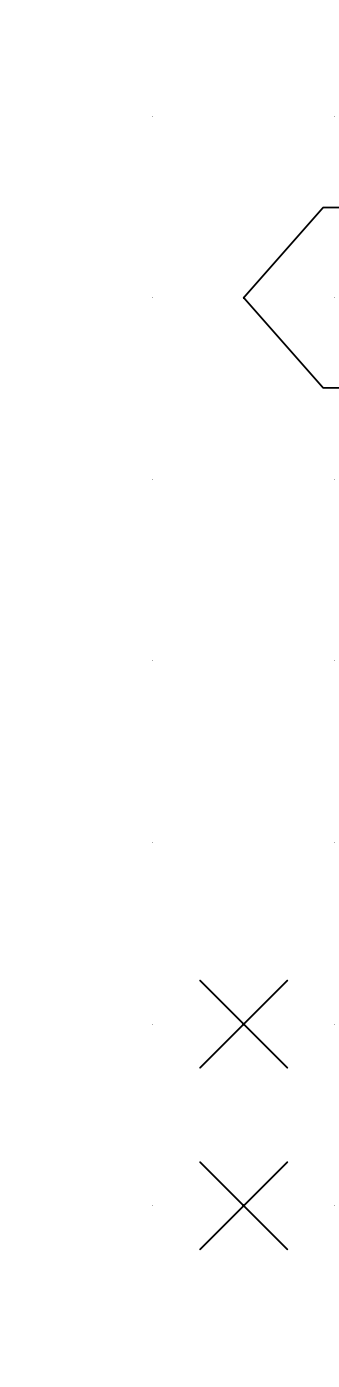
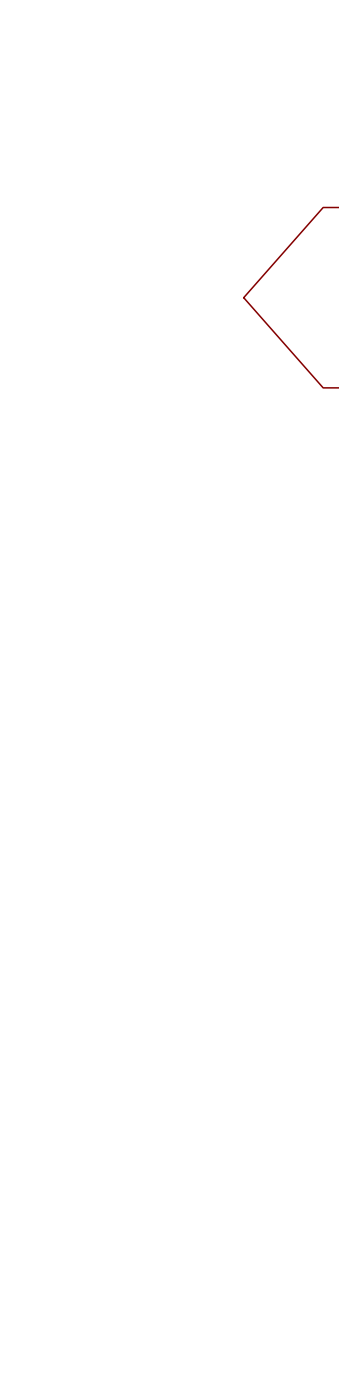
no-connect mark: (243, 1024) -> none
no-connect mark: (243, 1205) -> none

